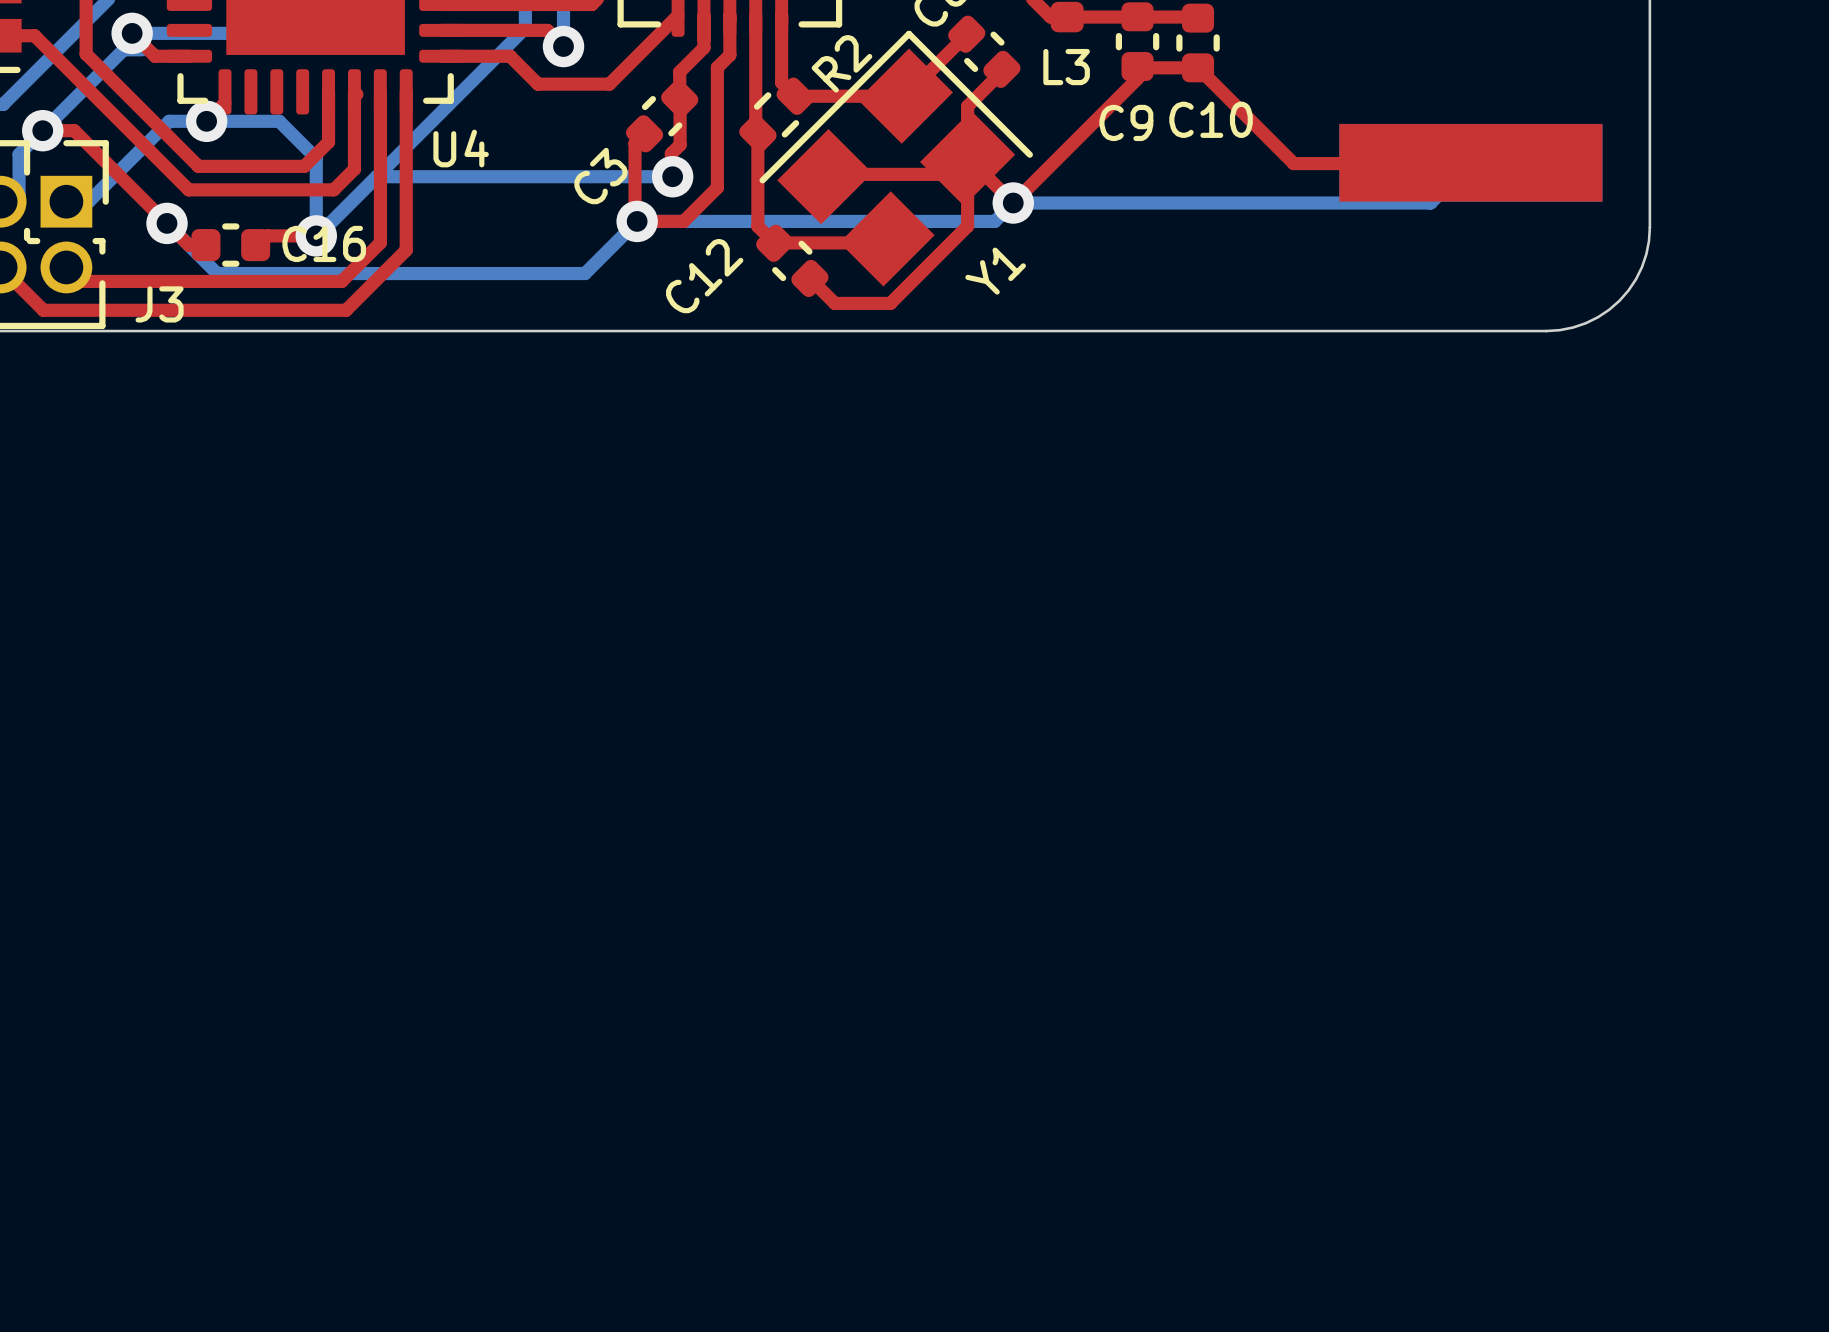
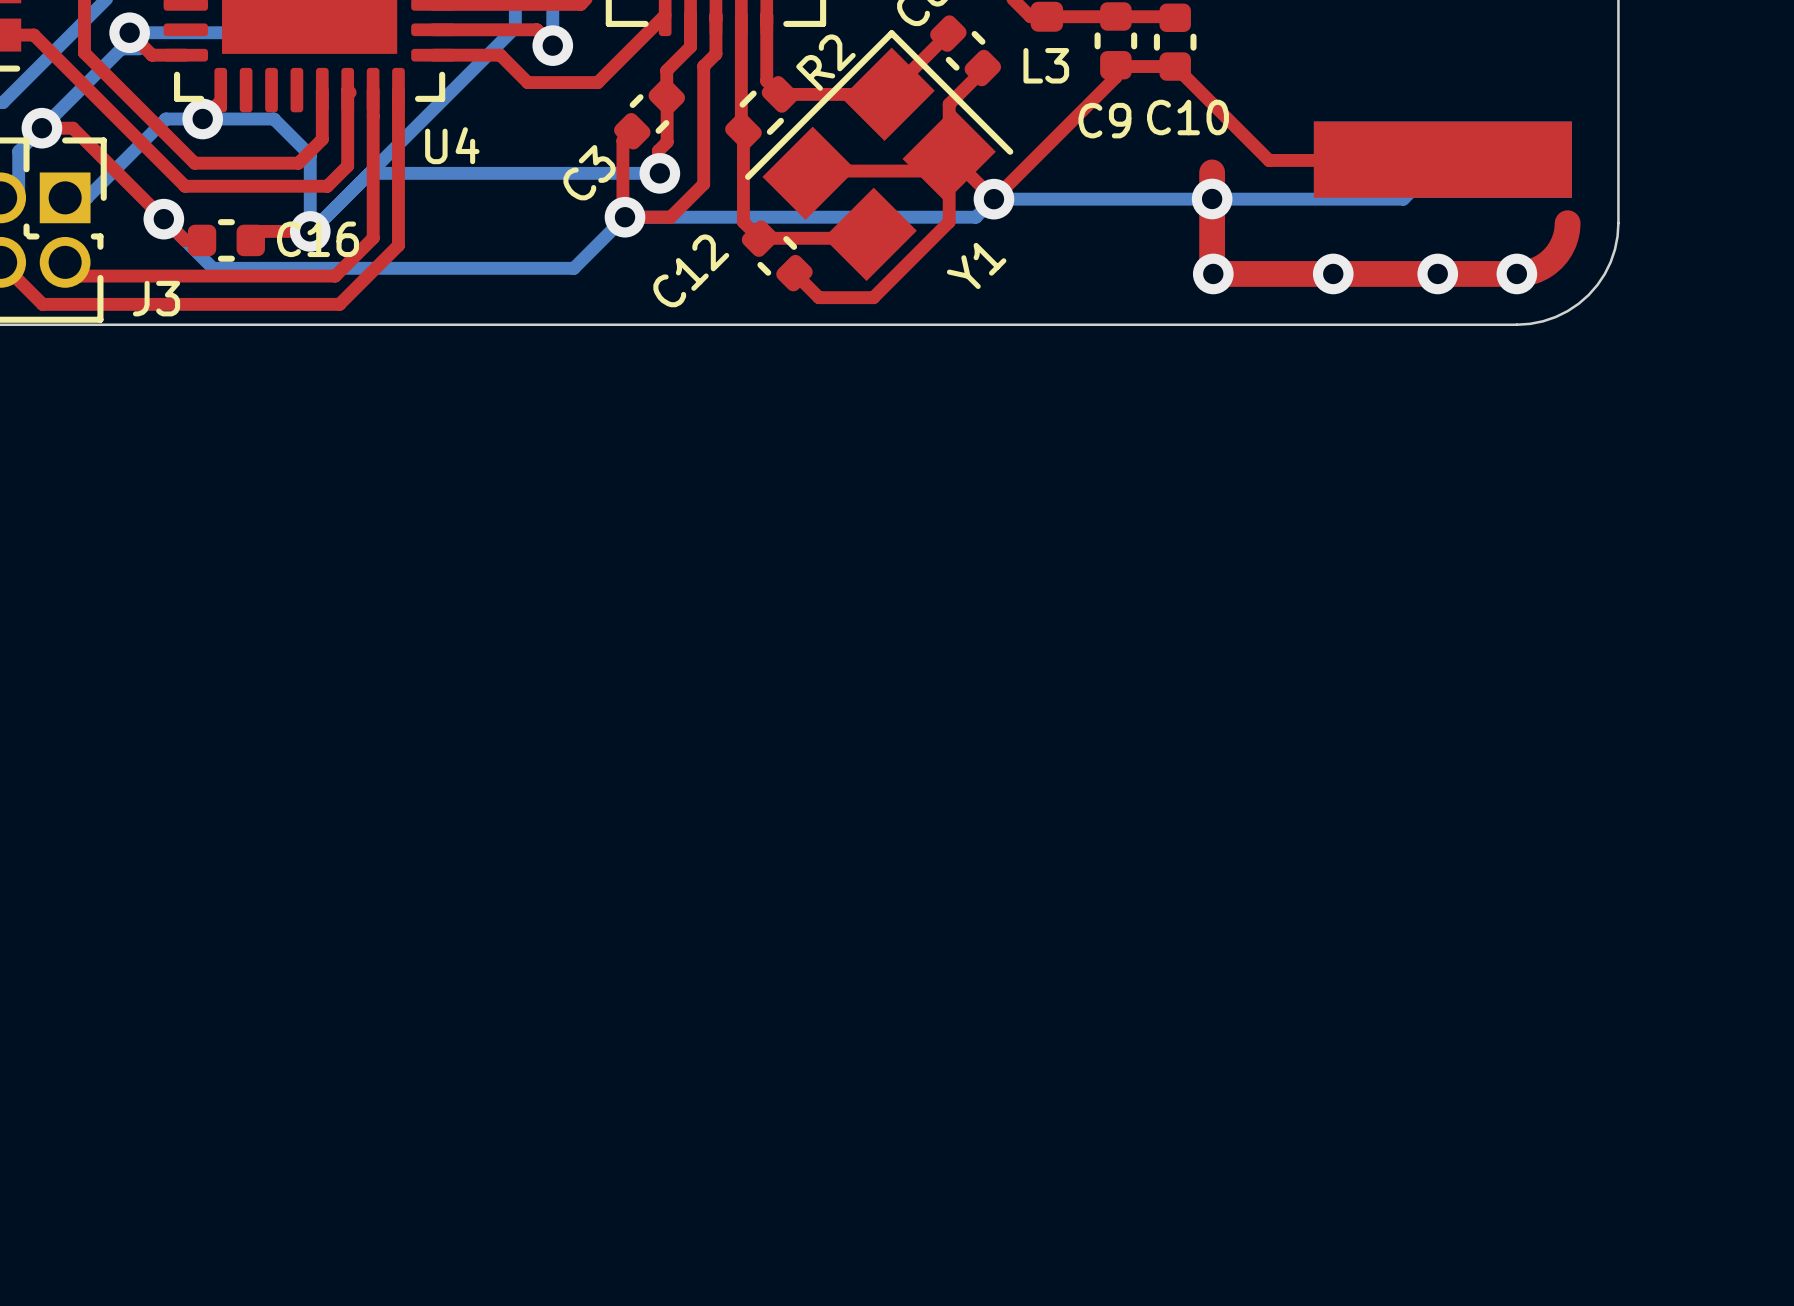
top track: none -> (1212, 172) (1212, 273) (1523, 273) (1542, 267) (1552, 259) (1563, 242) (1567, 223)
via: none -> (1212, 198)
via: none -> (1213, 273)
via: none -> (1333, 273)
via: none -> (1437, 273)
via: none -> (1516, 273)

